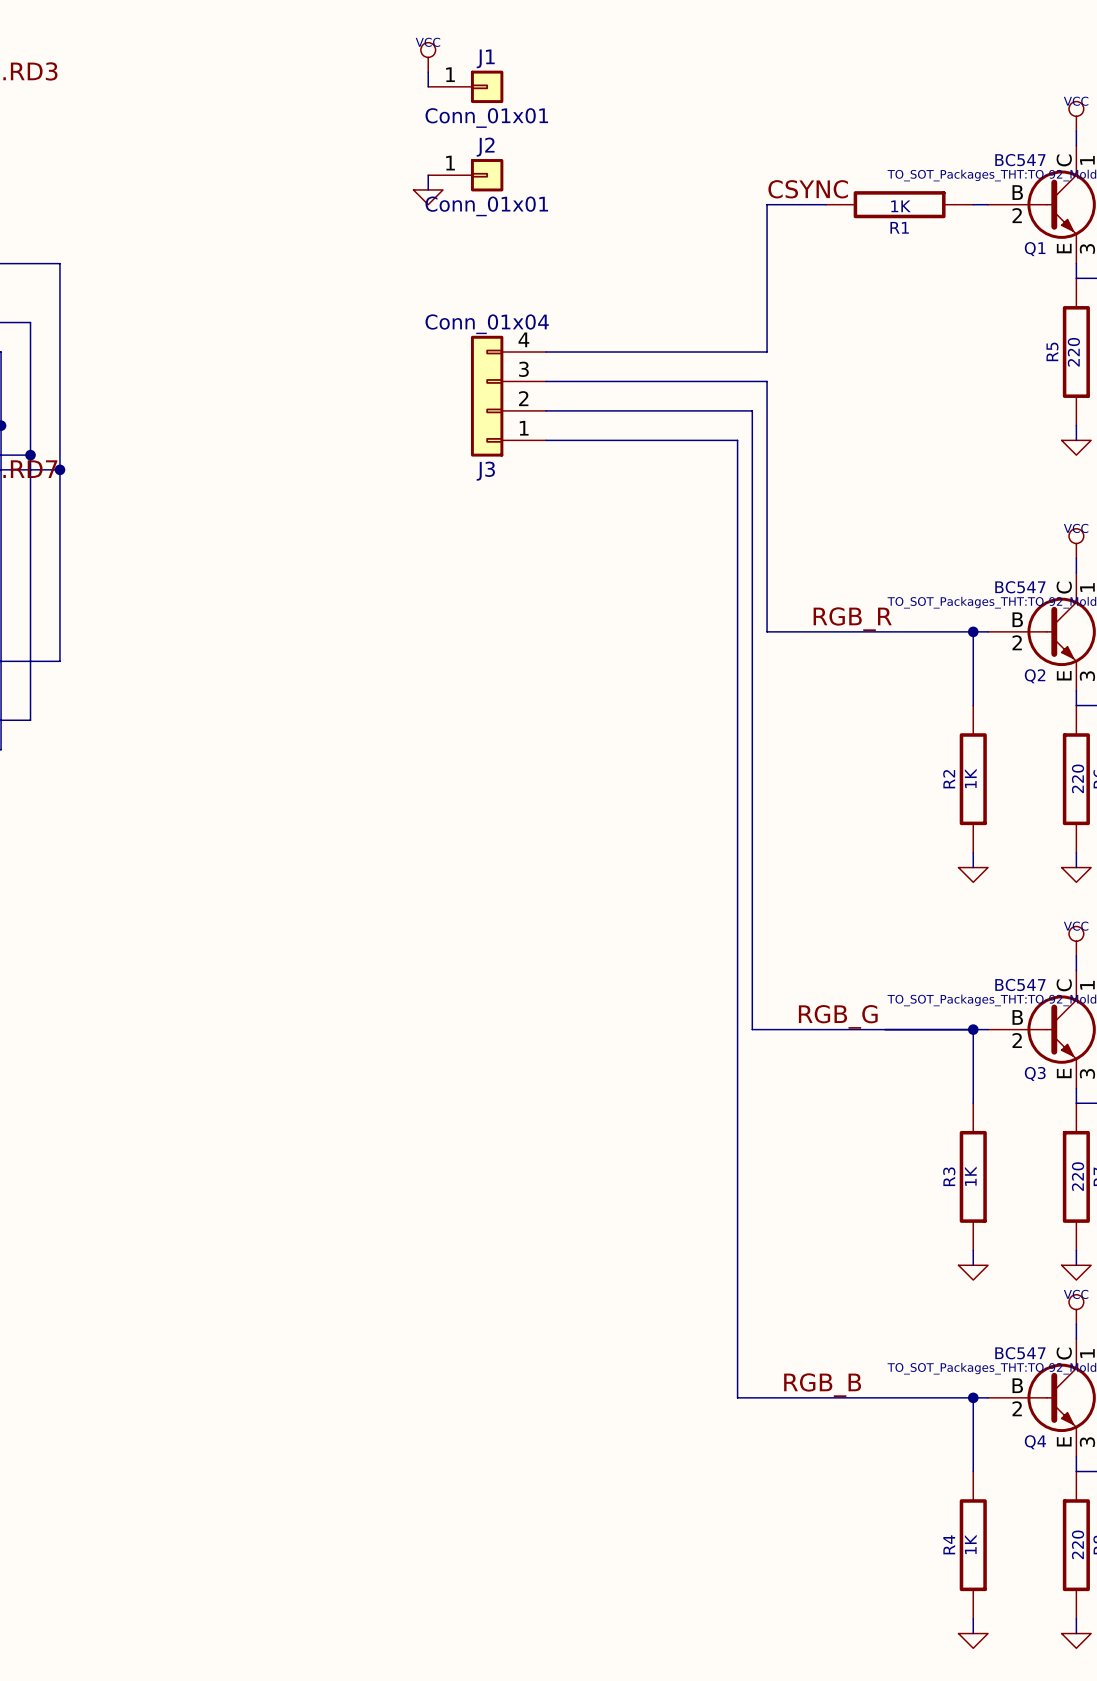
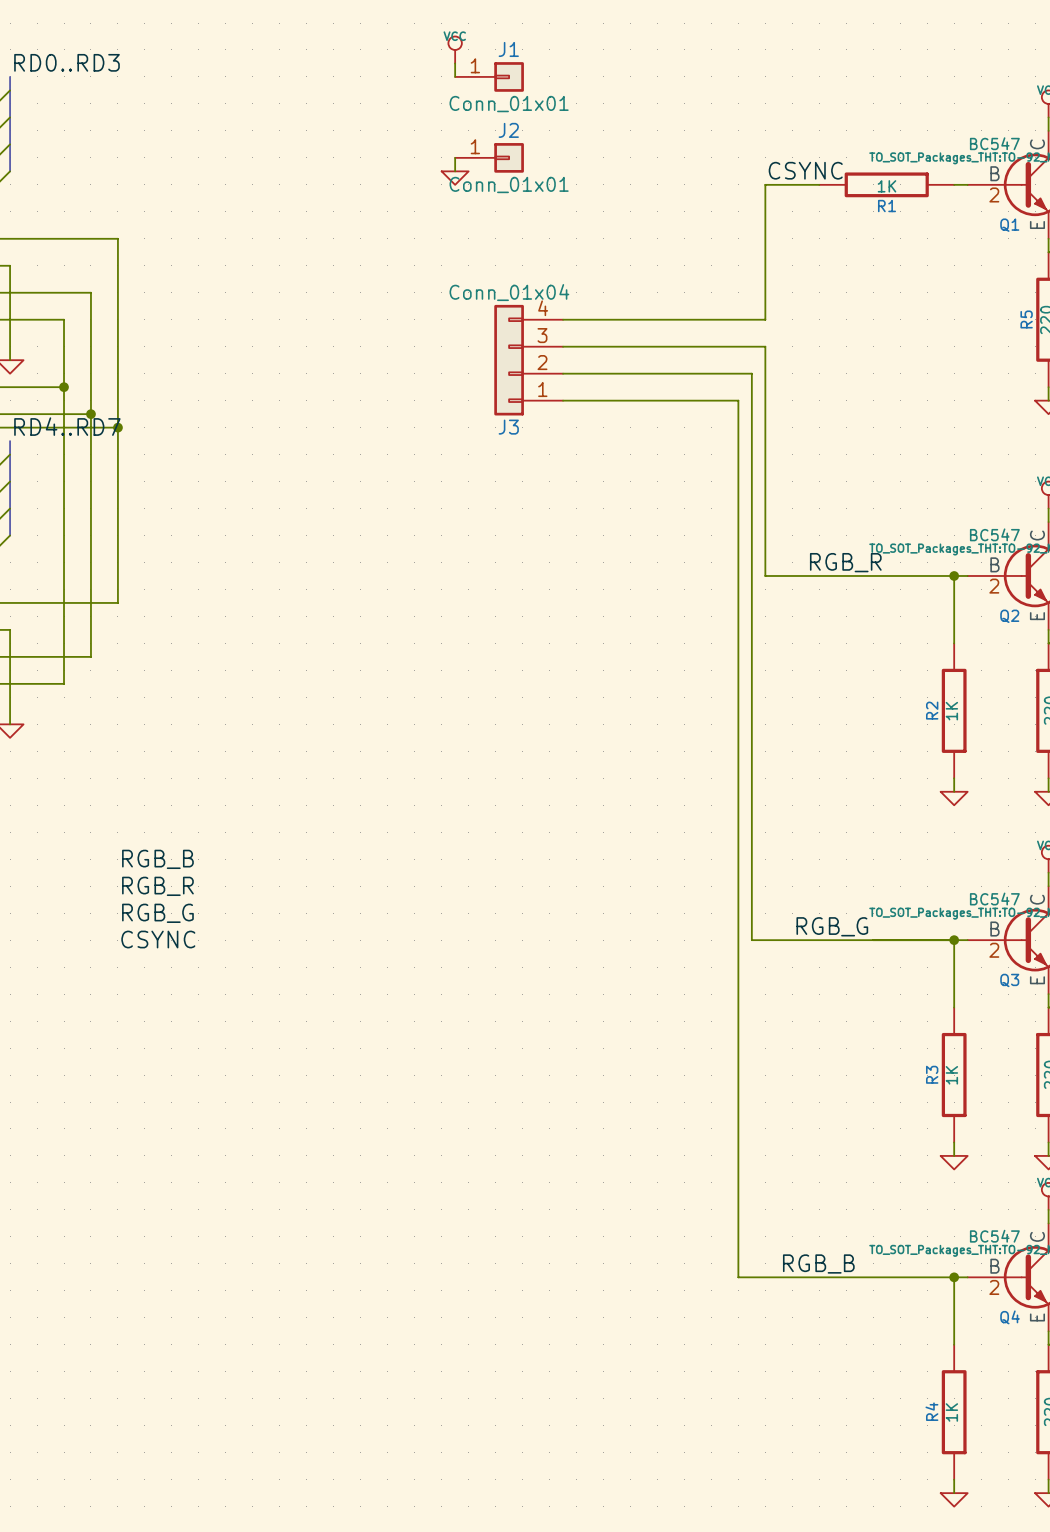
label: none -> RGB_B (157, 859)
label: none -> RGB_R (157, 886)
label: none -> RGB_G (157, 913)
label: none -> CSYNC (158, 939)

